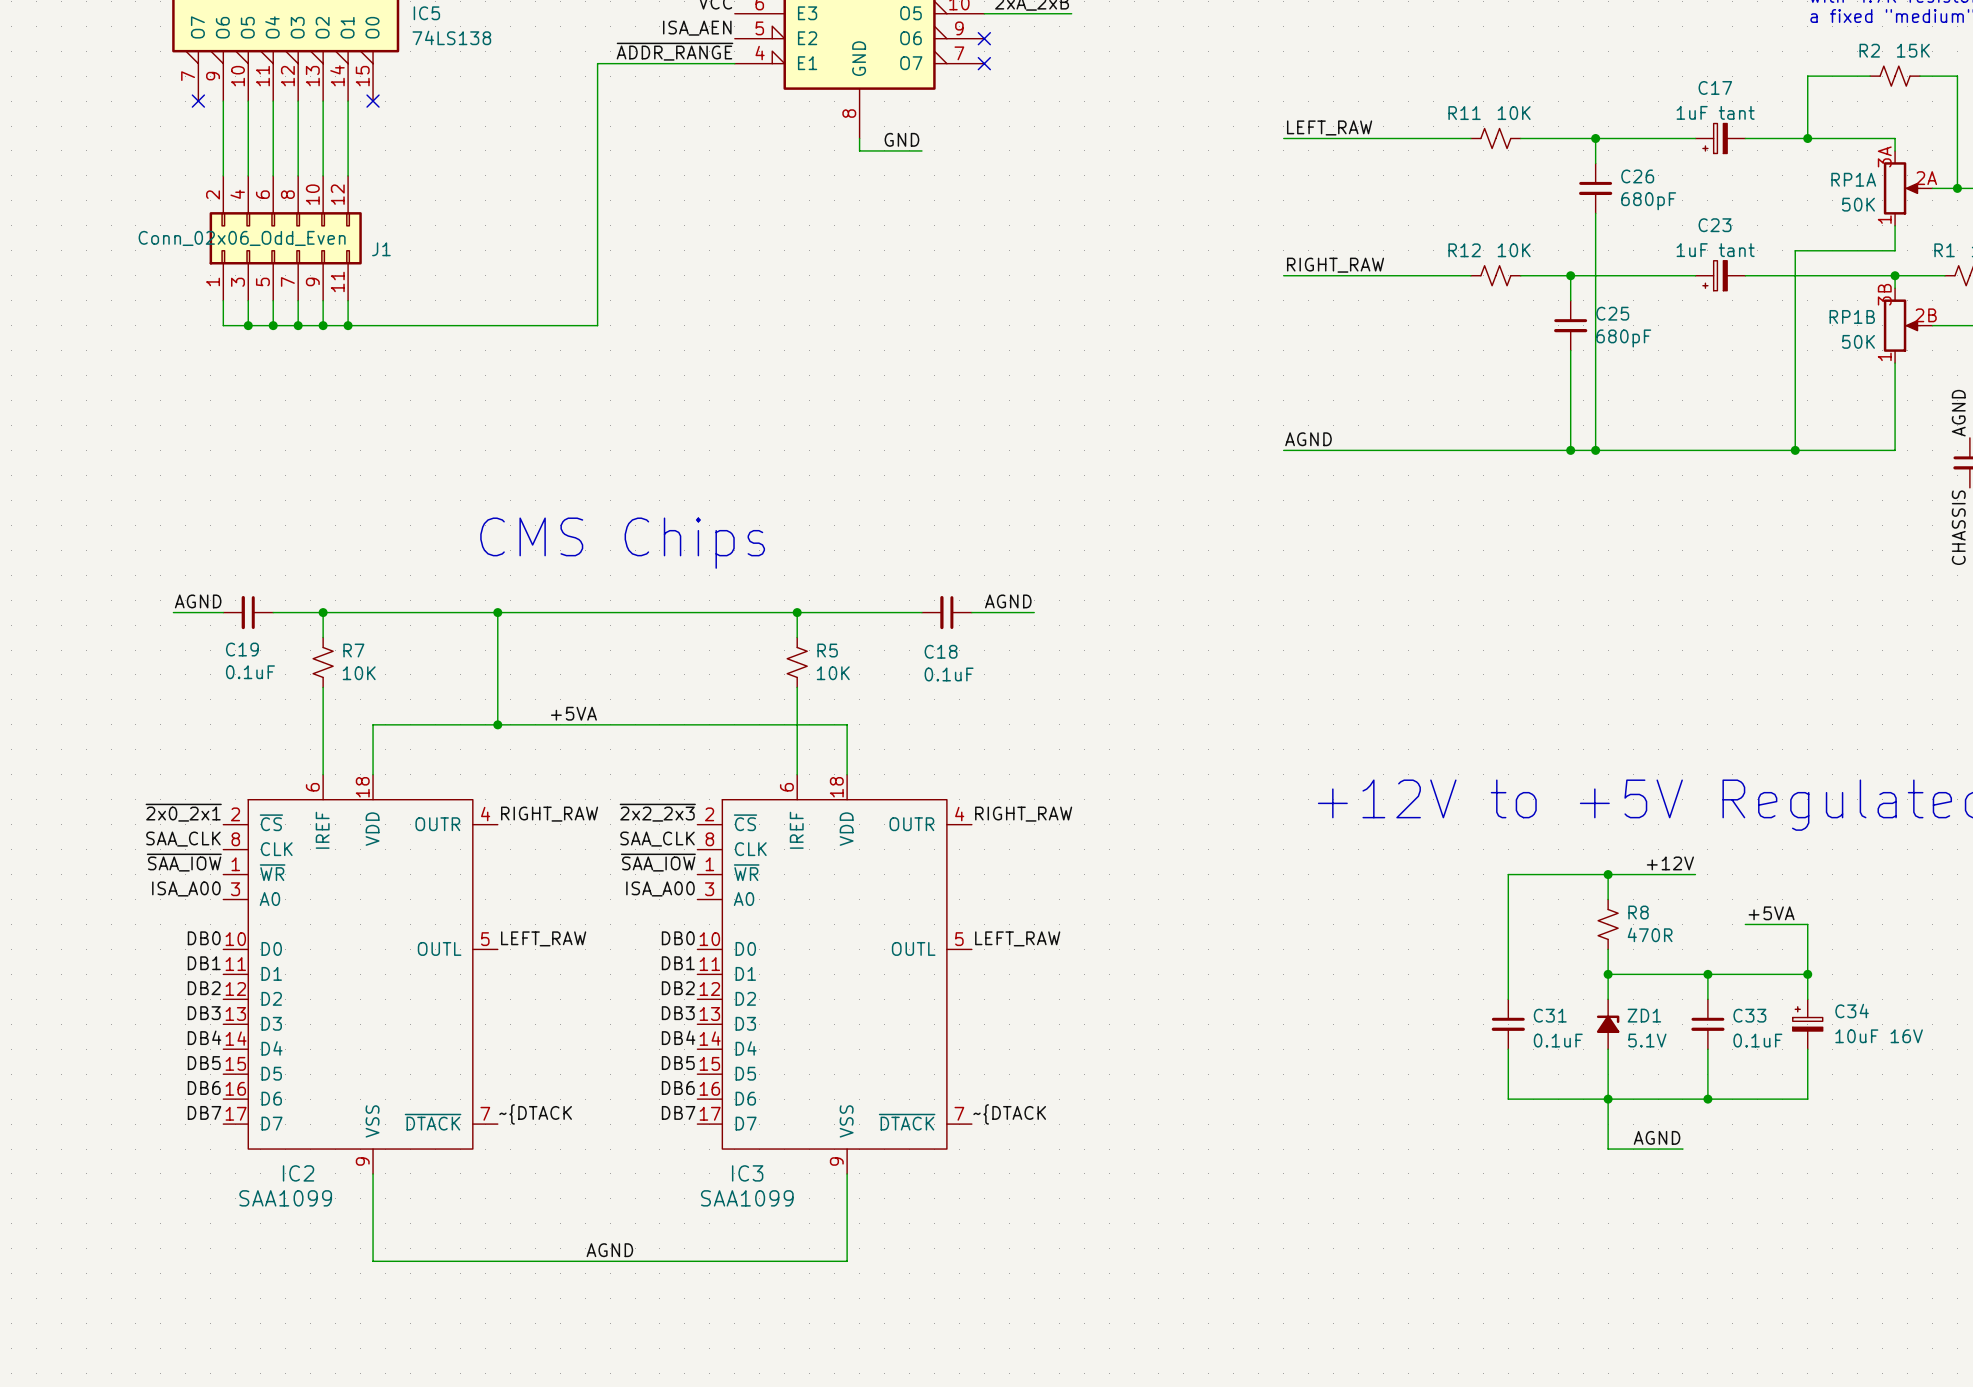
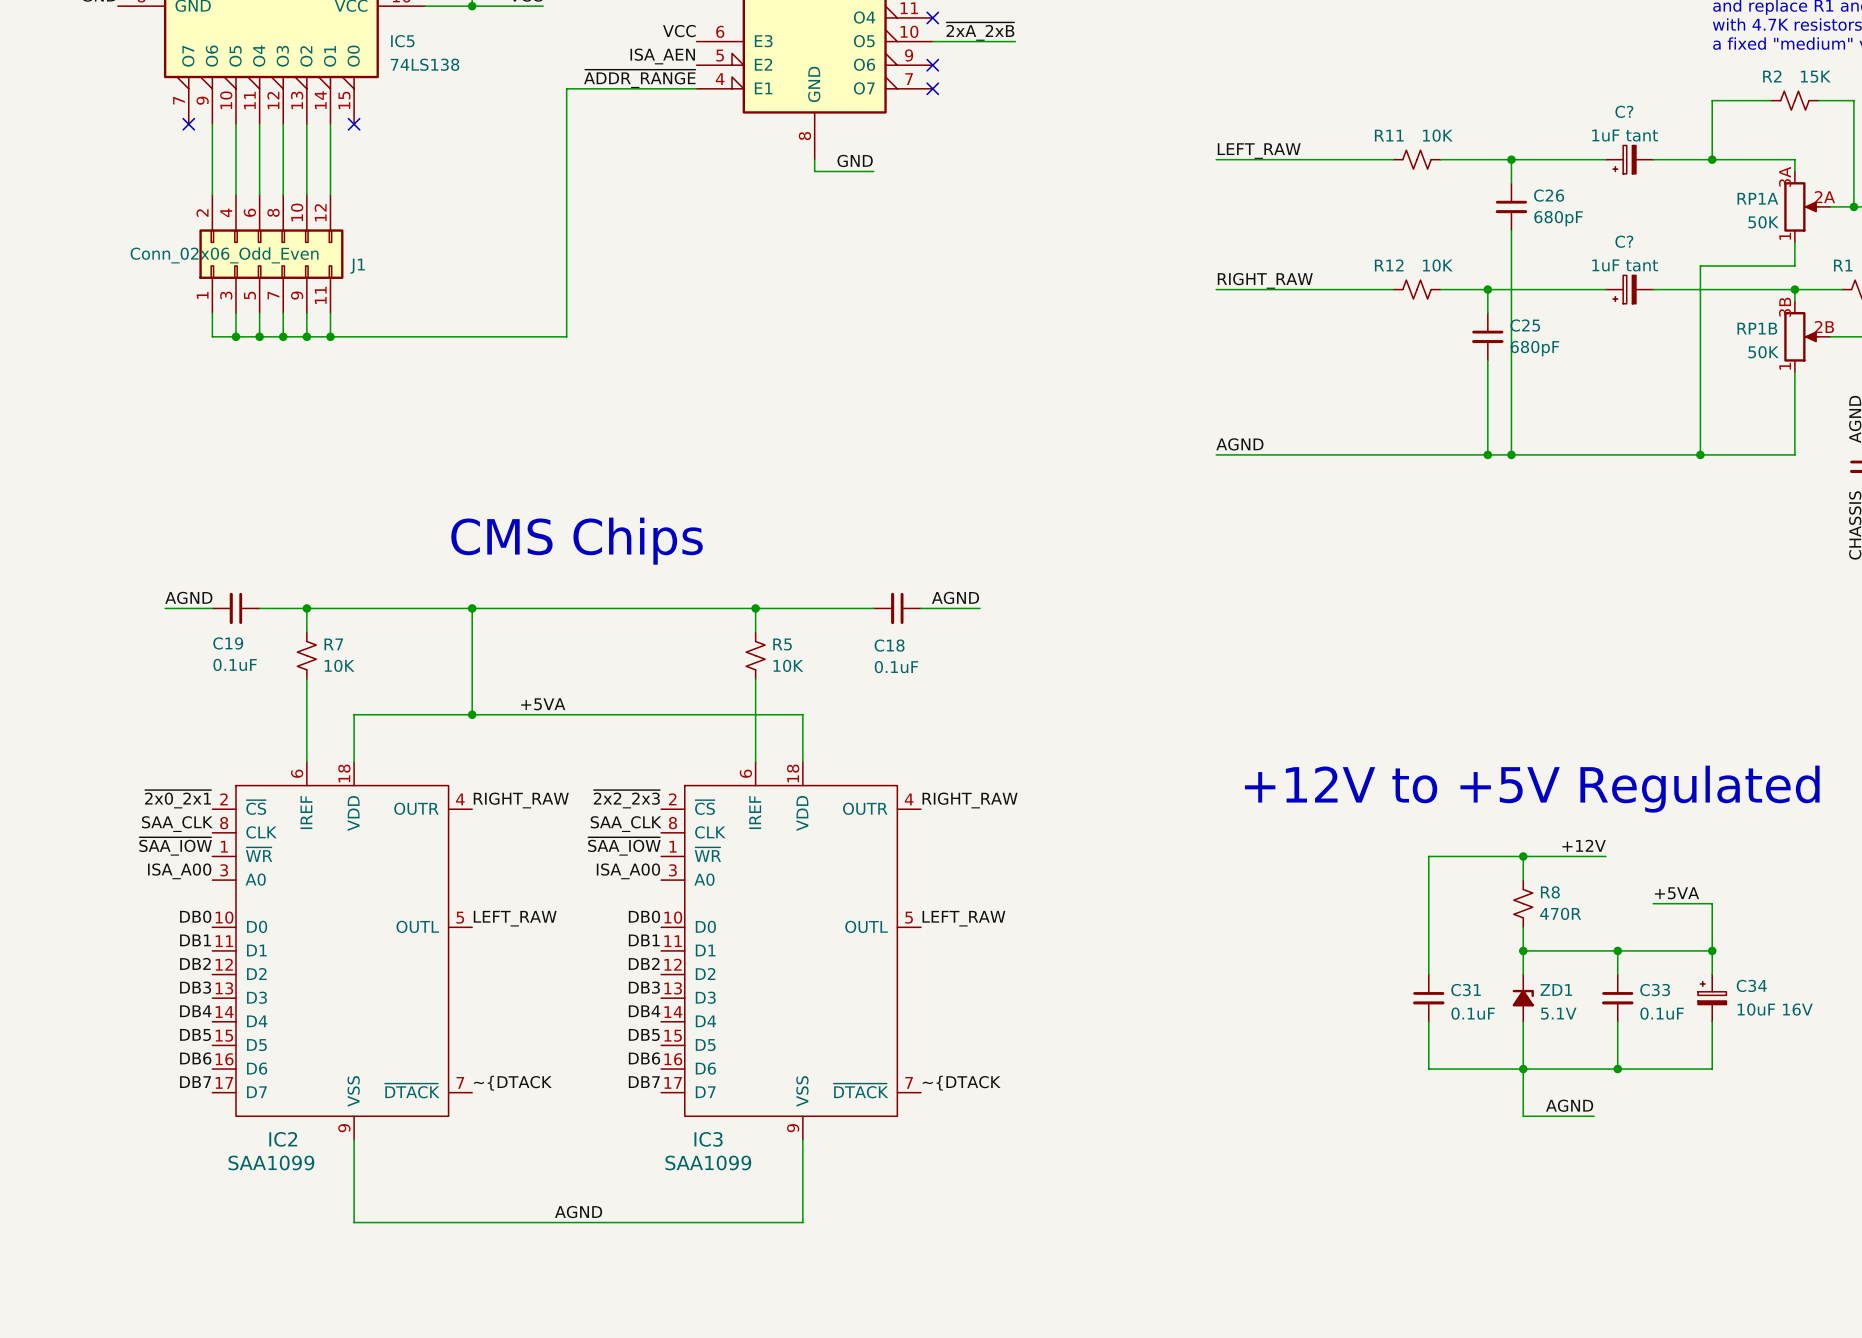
C17 name: C17 (1715, 87) -> C? (1624, 111)
C23 name: C23 (1715, 225) -> C? (1624, 241)

